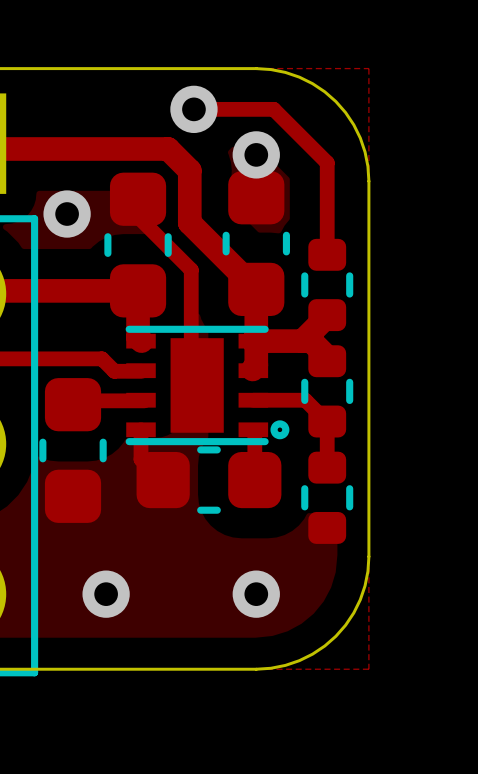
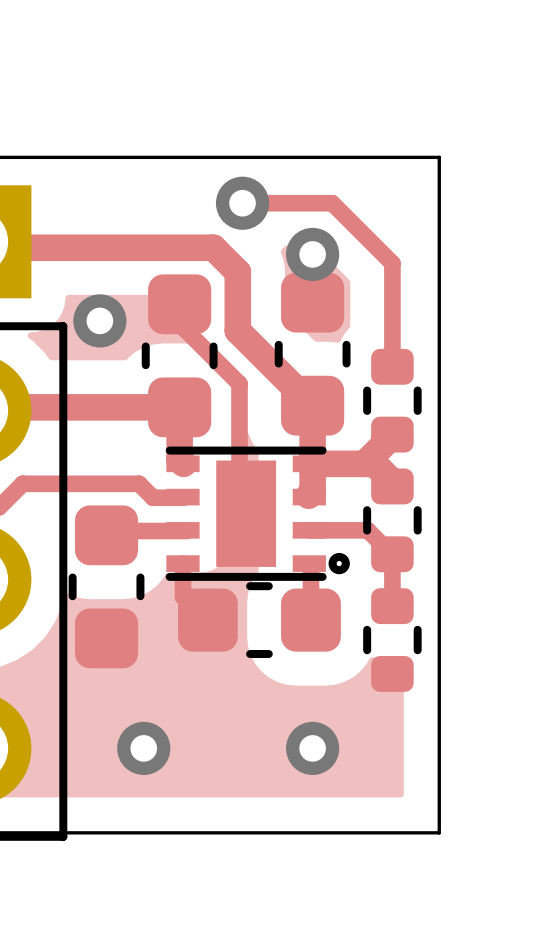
board edge: (256, 68) (270, 69) (299, 77) (312, 83) (335, 101) (353, 124) (360, 138) (367, 166) (368, 181) -> (312, 157) (439, 157) (439, 284)
board edge: (368, 556) (367, 571) (360, 599) (353, 612) (335, 636) (324, 645) (299, 660) (270, 668) (256, 669) -> (439, 706) (439, 832) (312, 832)

